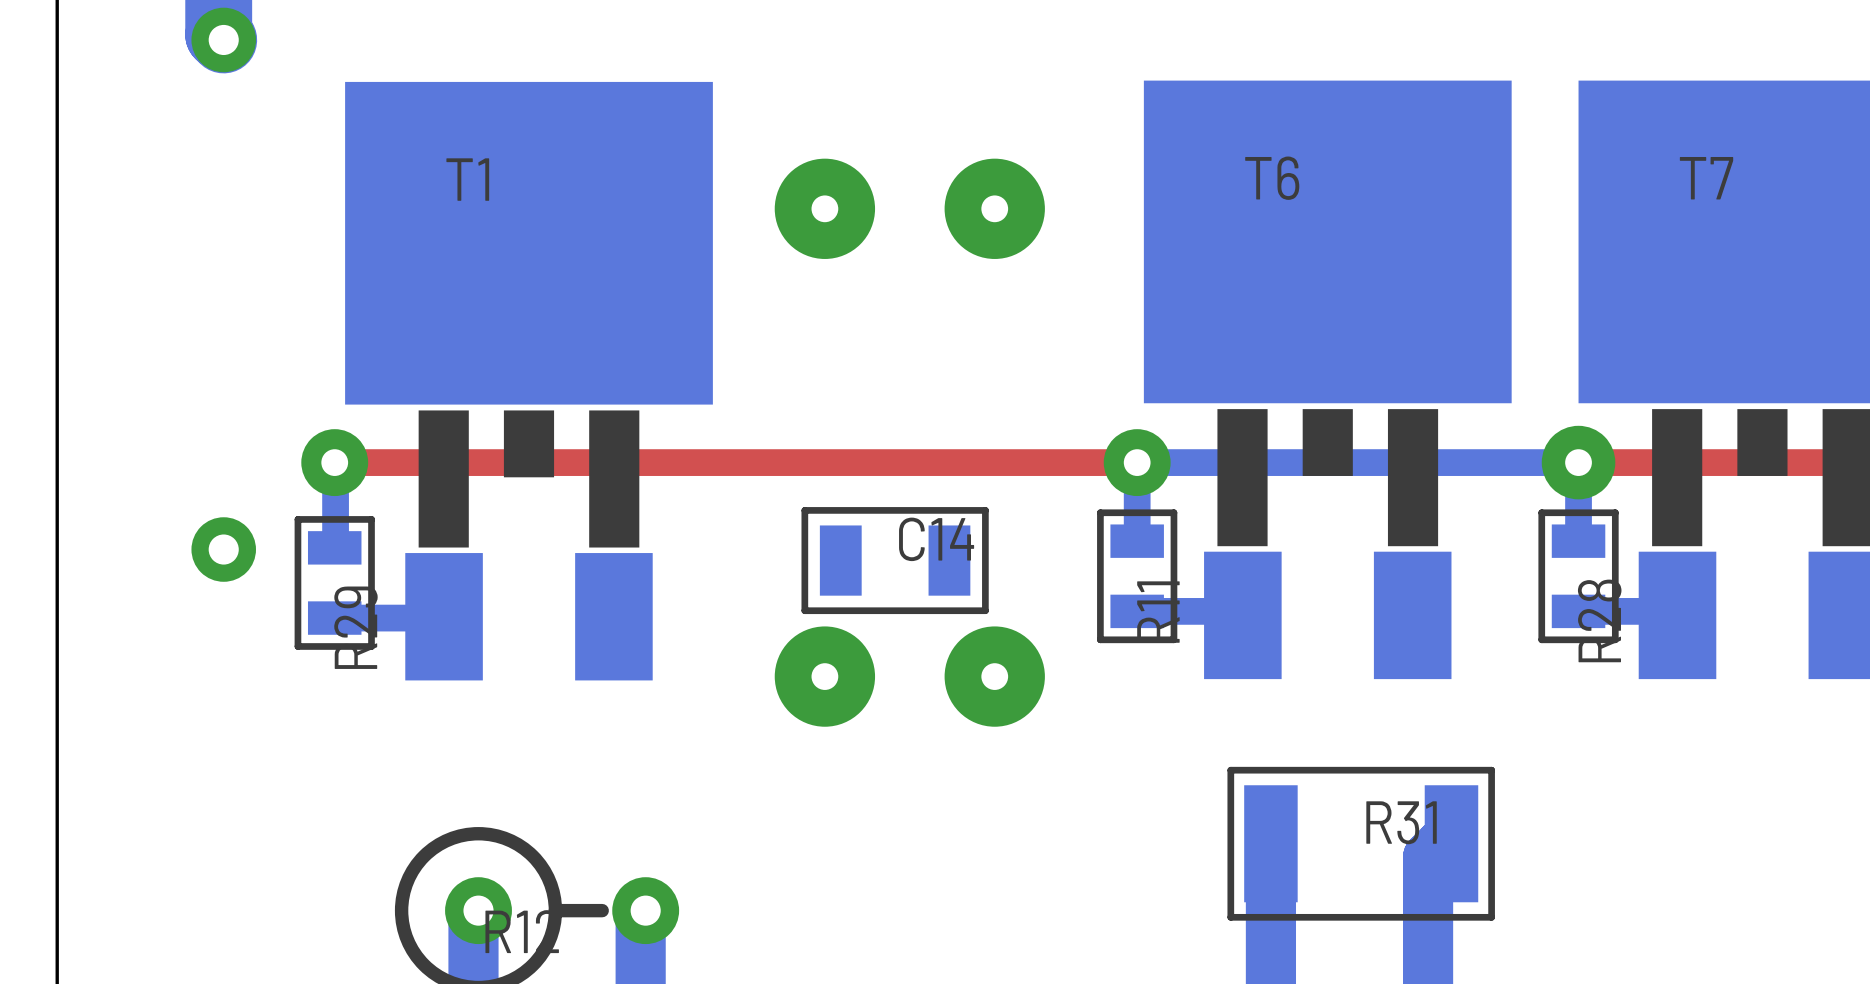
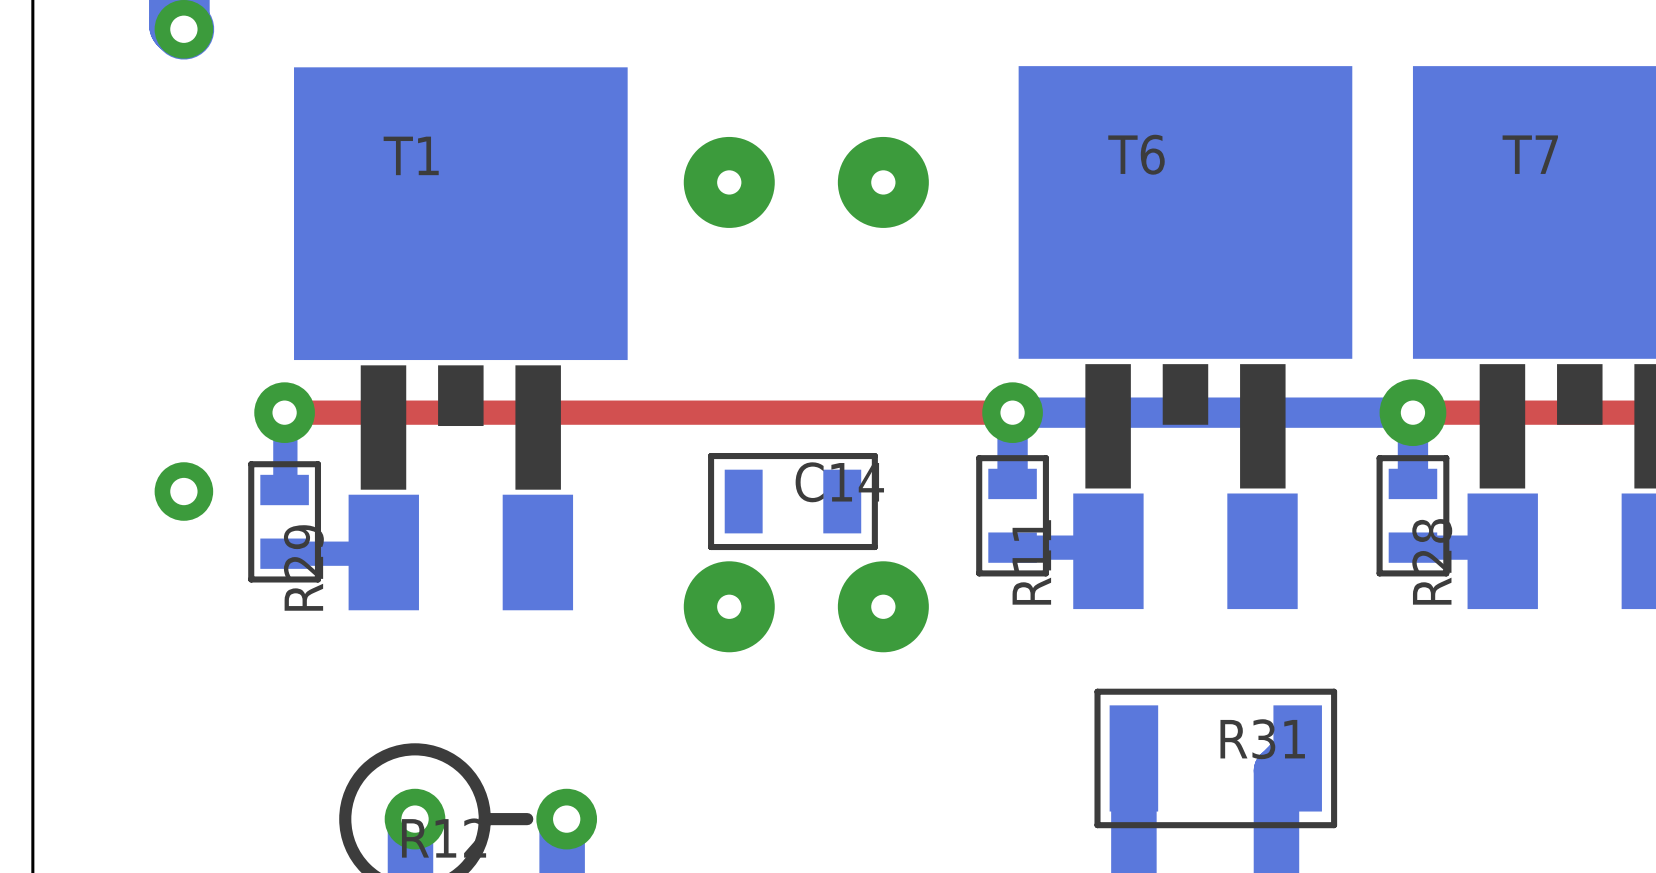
bottom track width: thin (1578, 541) (1578, 462) (1137, 462) (1137, 541) -> thick (1412, 483) (1412, 412) (1012, 412) (1012, 483)

